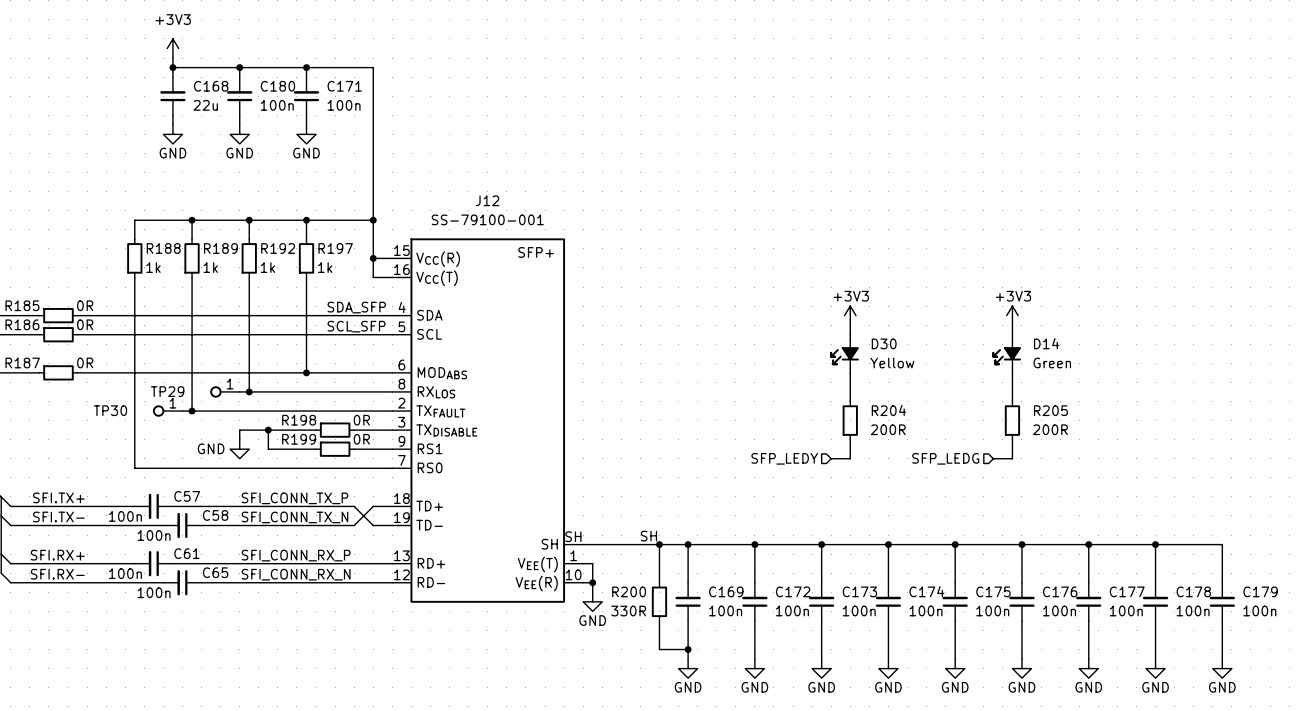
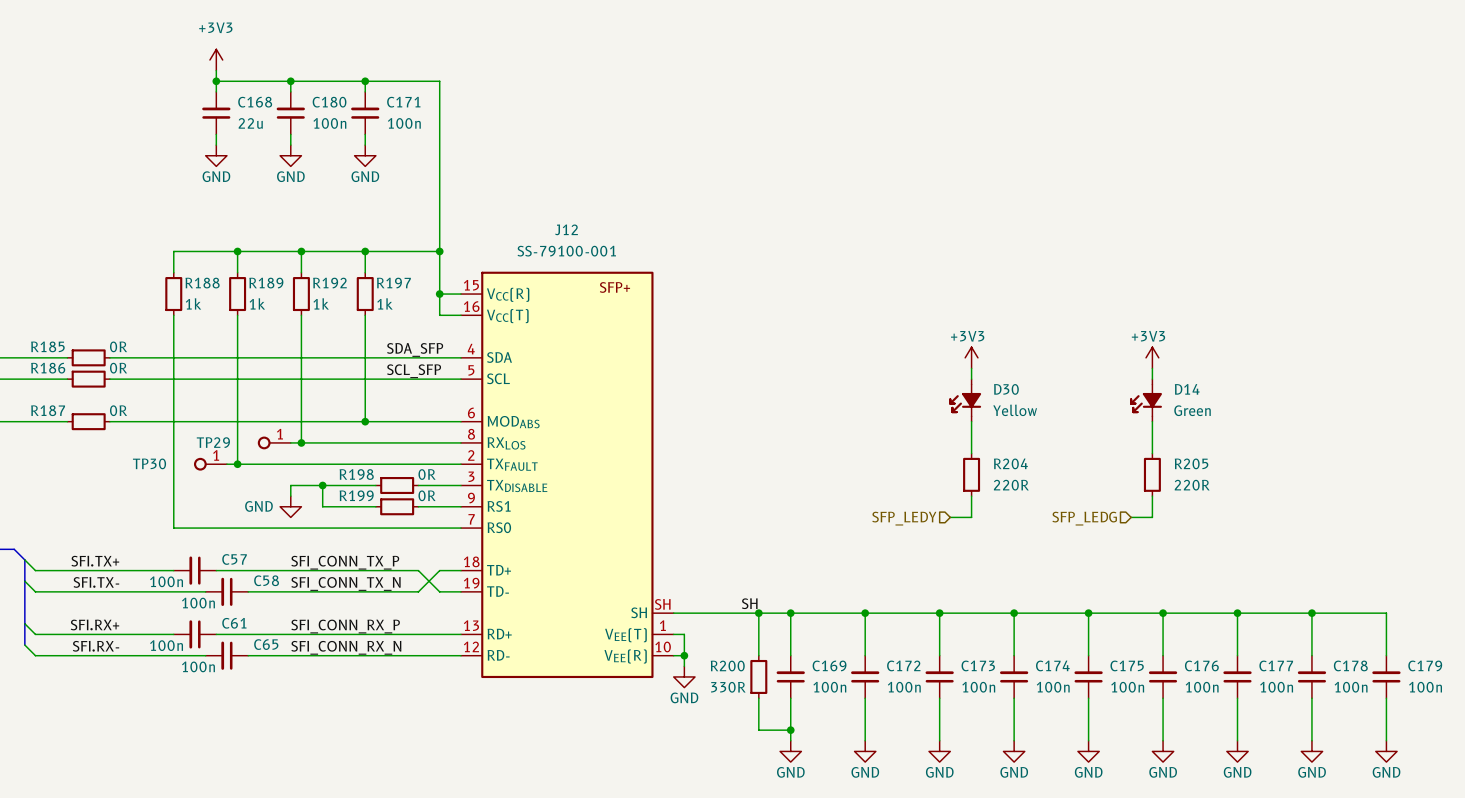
R204 text: 200R (888, 429) -> 220R (1011, 485)
R205 text: 200R (1050, 429) -> 220R (1192, 485)

